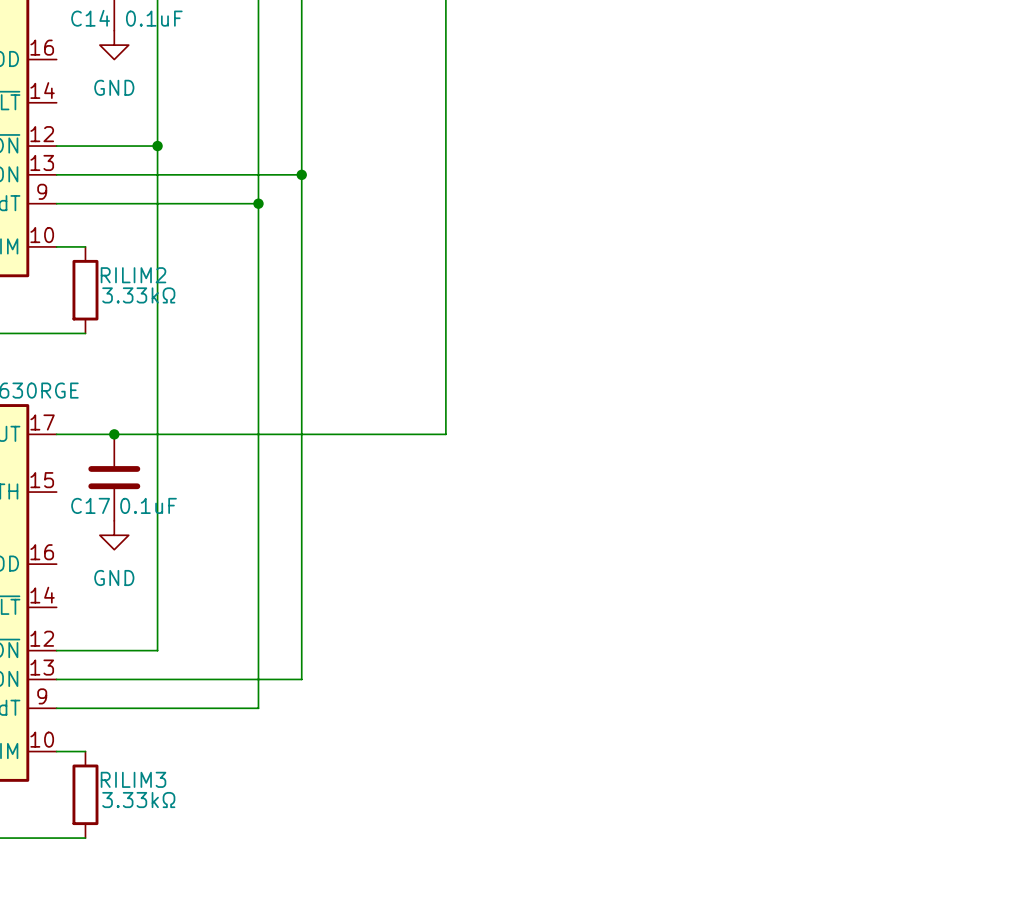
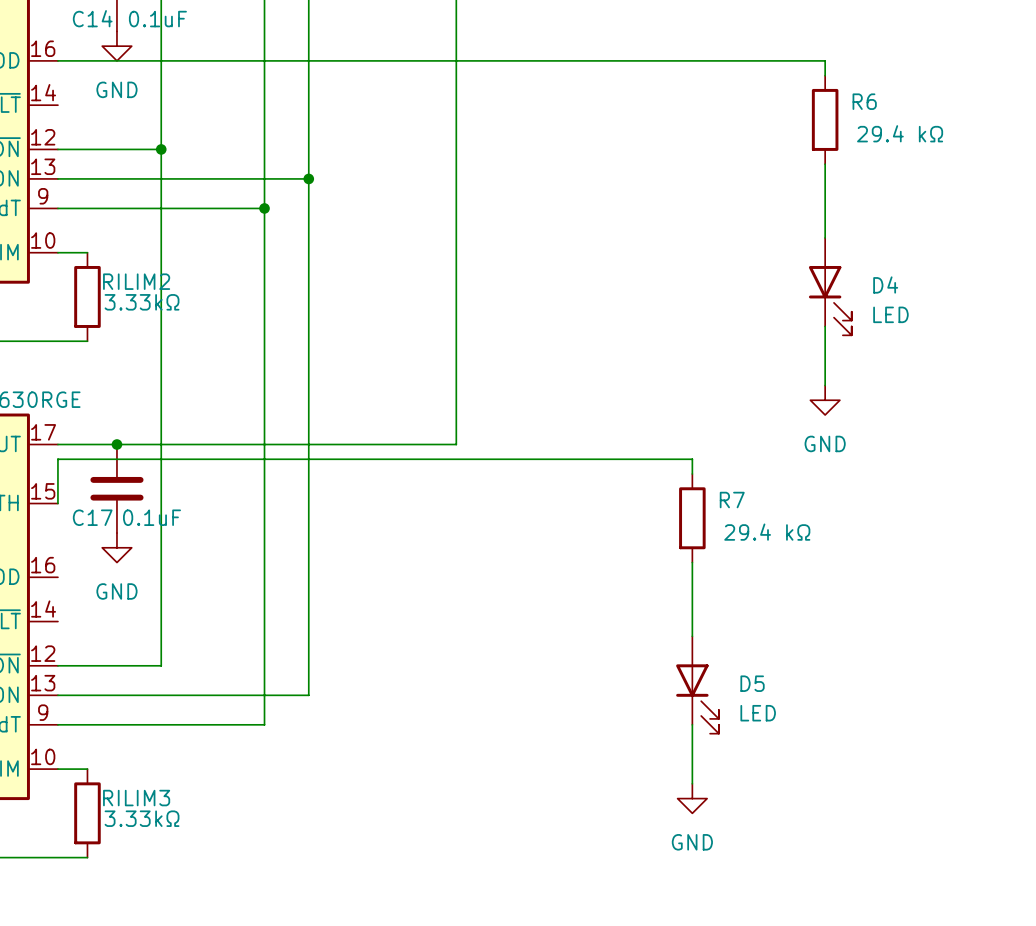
wire: none -> (57, 60) (825, 60) (825, 75)
R6: none -> 29.4 kΩ (825, 119)
wire: none -> (825, 164) (825, 237)
D4: none -> LED (830, 286)
wire: none -> (825, 326) (825, 385)
power symbol: none -> GND (825, 400)
wire: none -> (692, 474) (692, 459) (57, 459) (57, 503)
R7: none -> 29.4 kΩ (692, 518)
wire: none -> (692, 562) (692, 636)
D5: none -> LED (697, 684)
wire: none -> (692, 724) (692, 783)
power symbol: none -> GND (692, 798)

